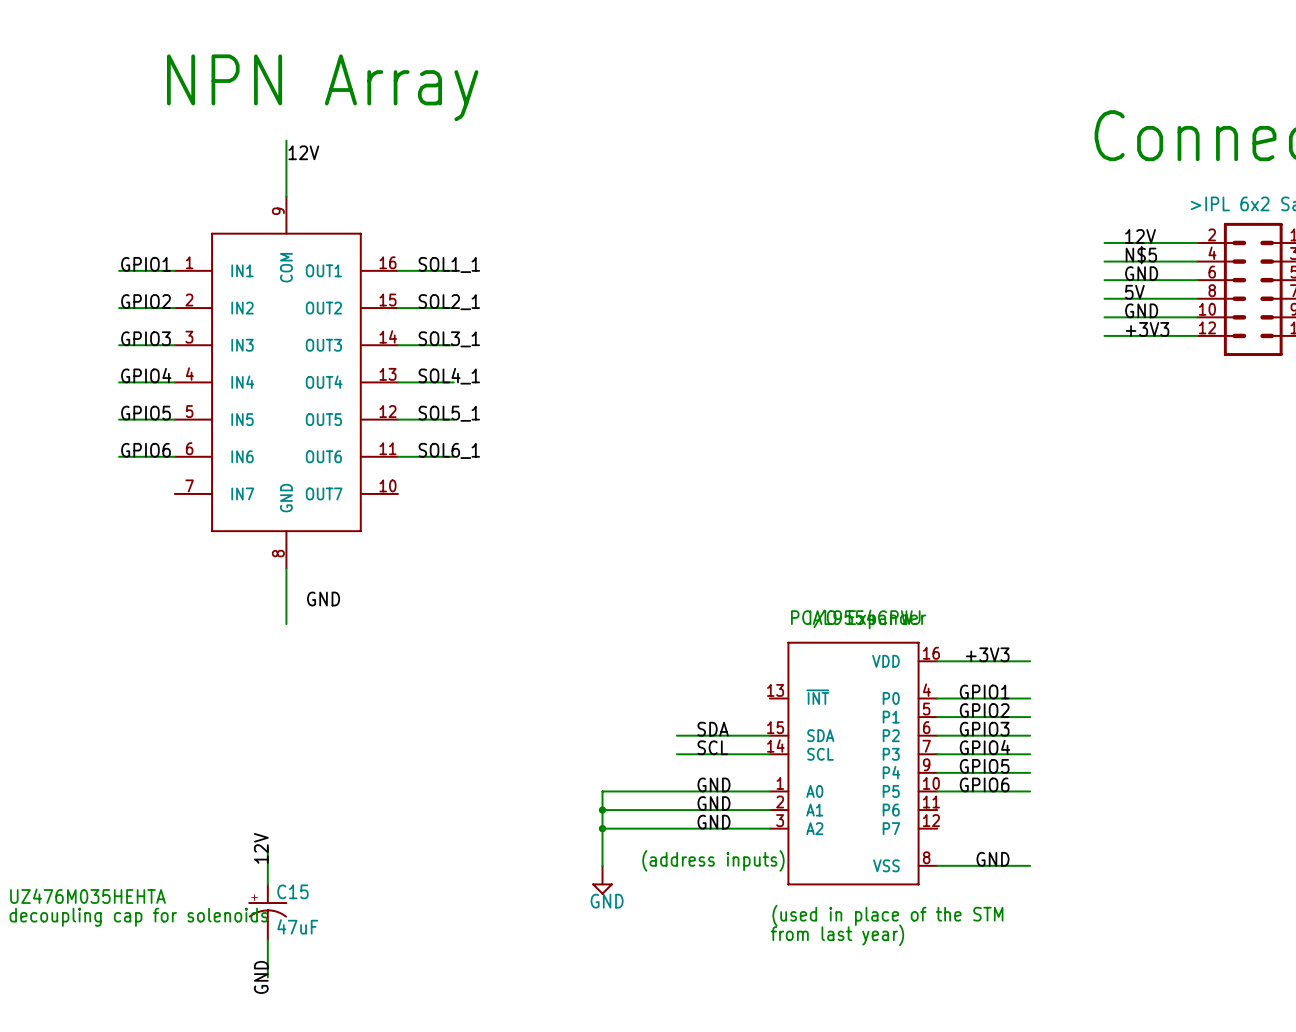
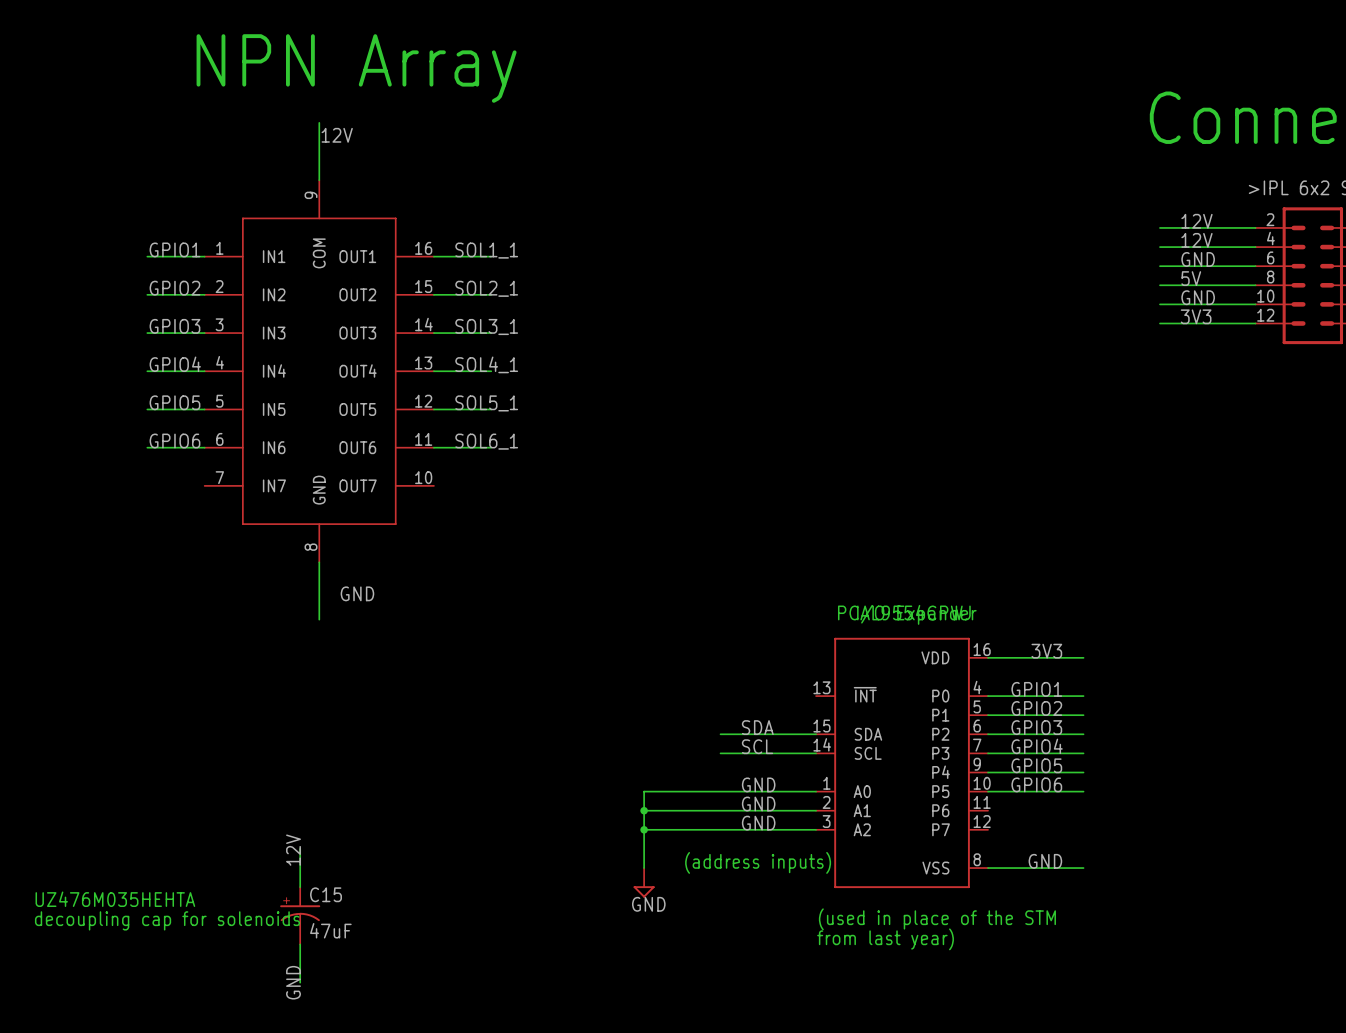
label: N$5 (1141, 255) -> 12V (1196, 240)
label: +3V3 (1147, 329) -> 3V3 (1196, 316)
label: +3V3 (987, 654) -> 3V3 (1046, 651)

